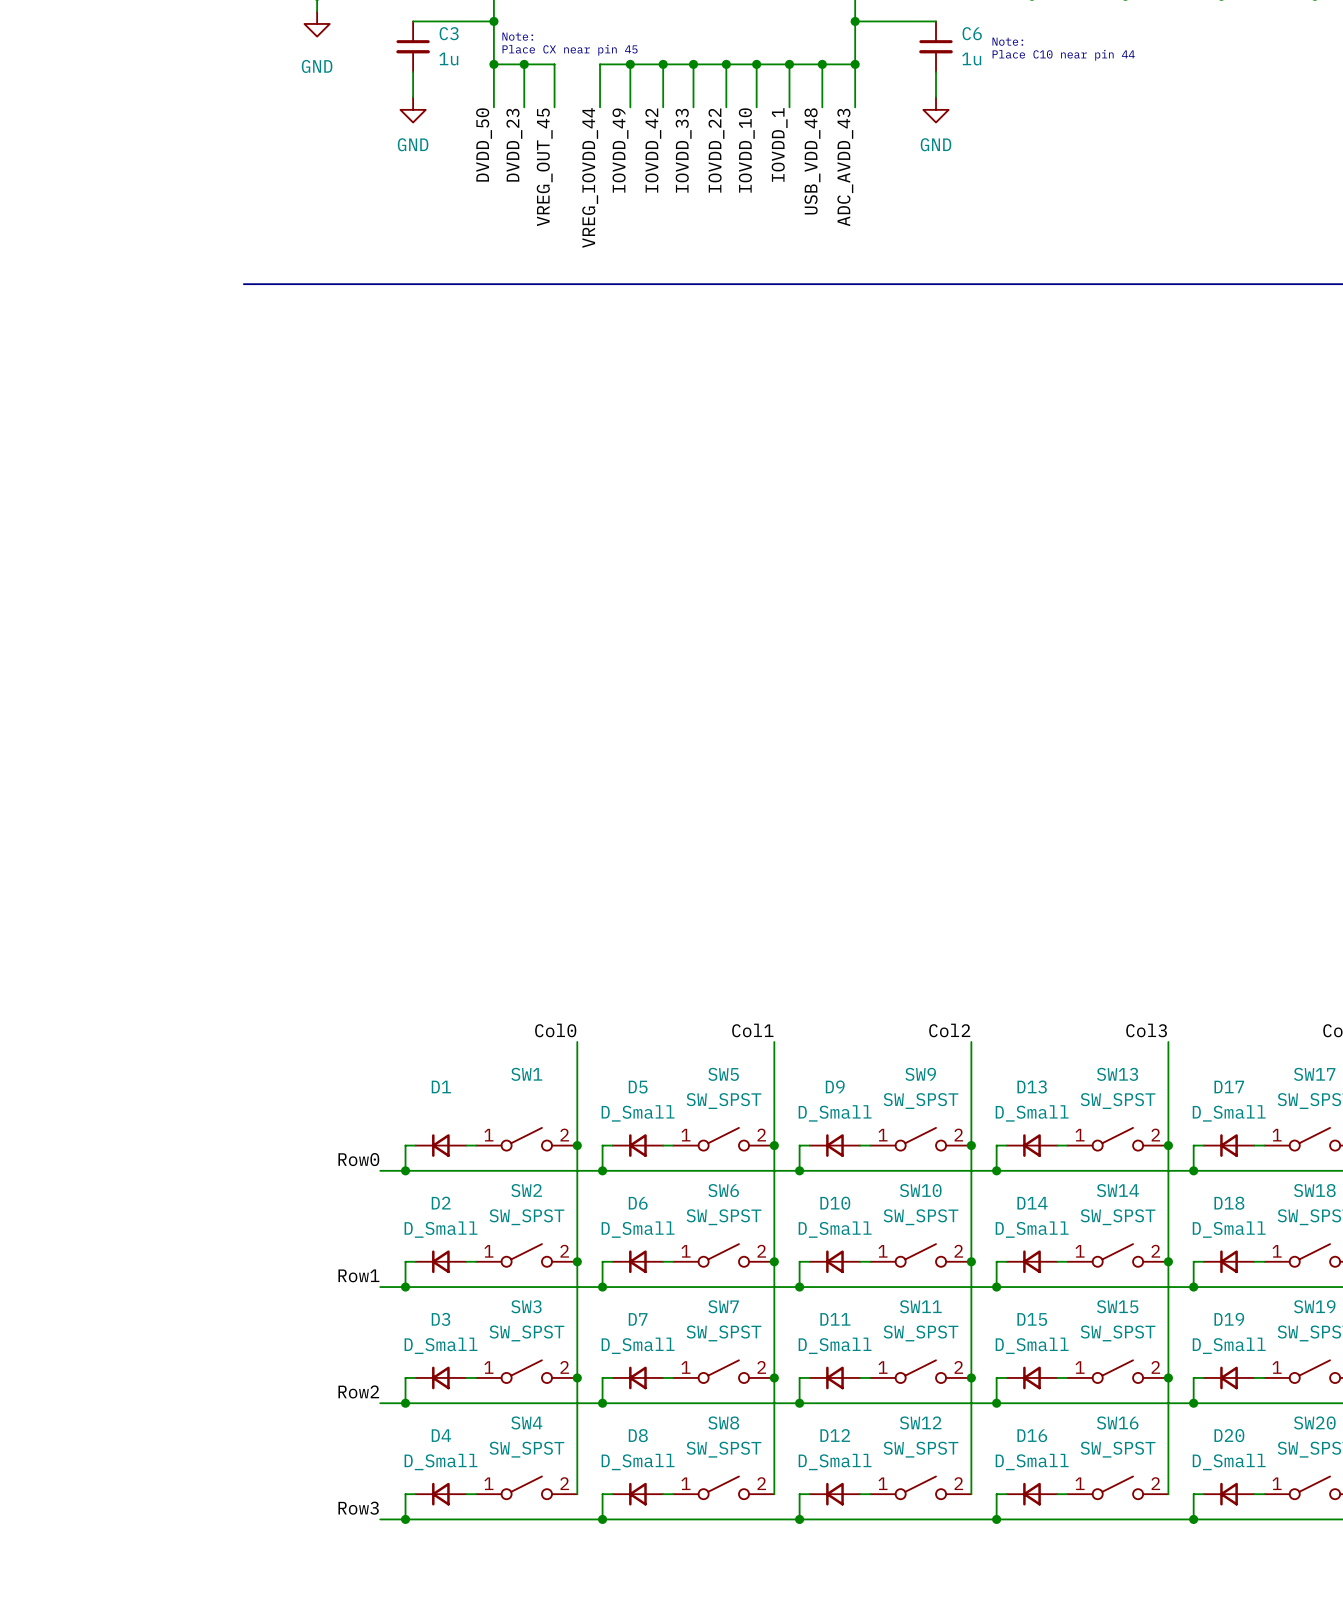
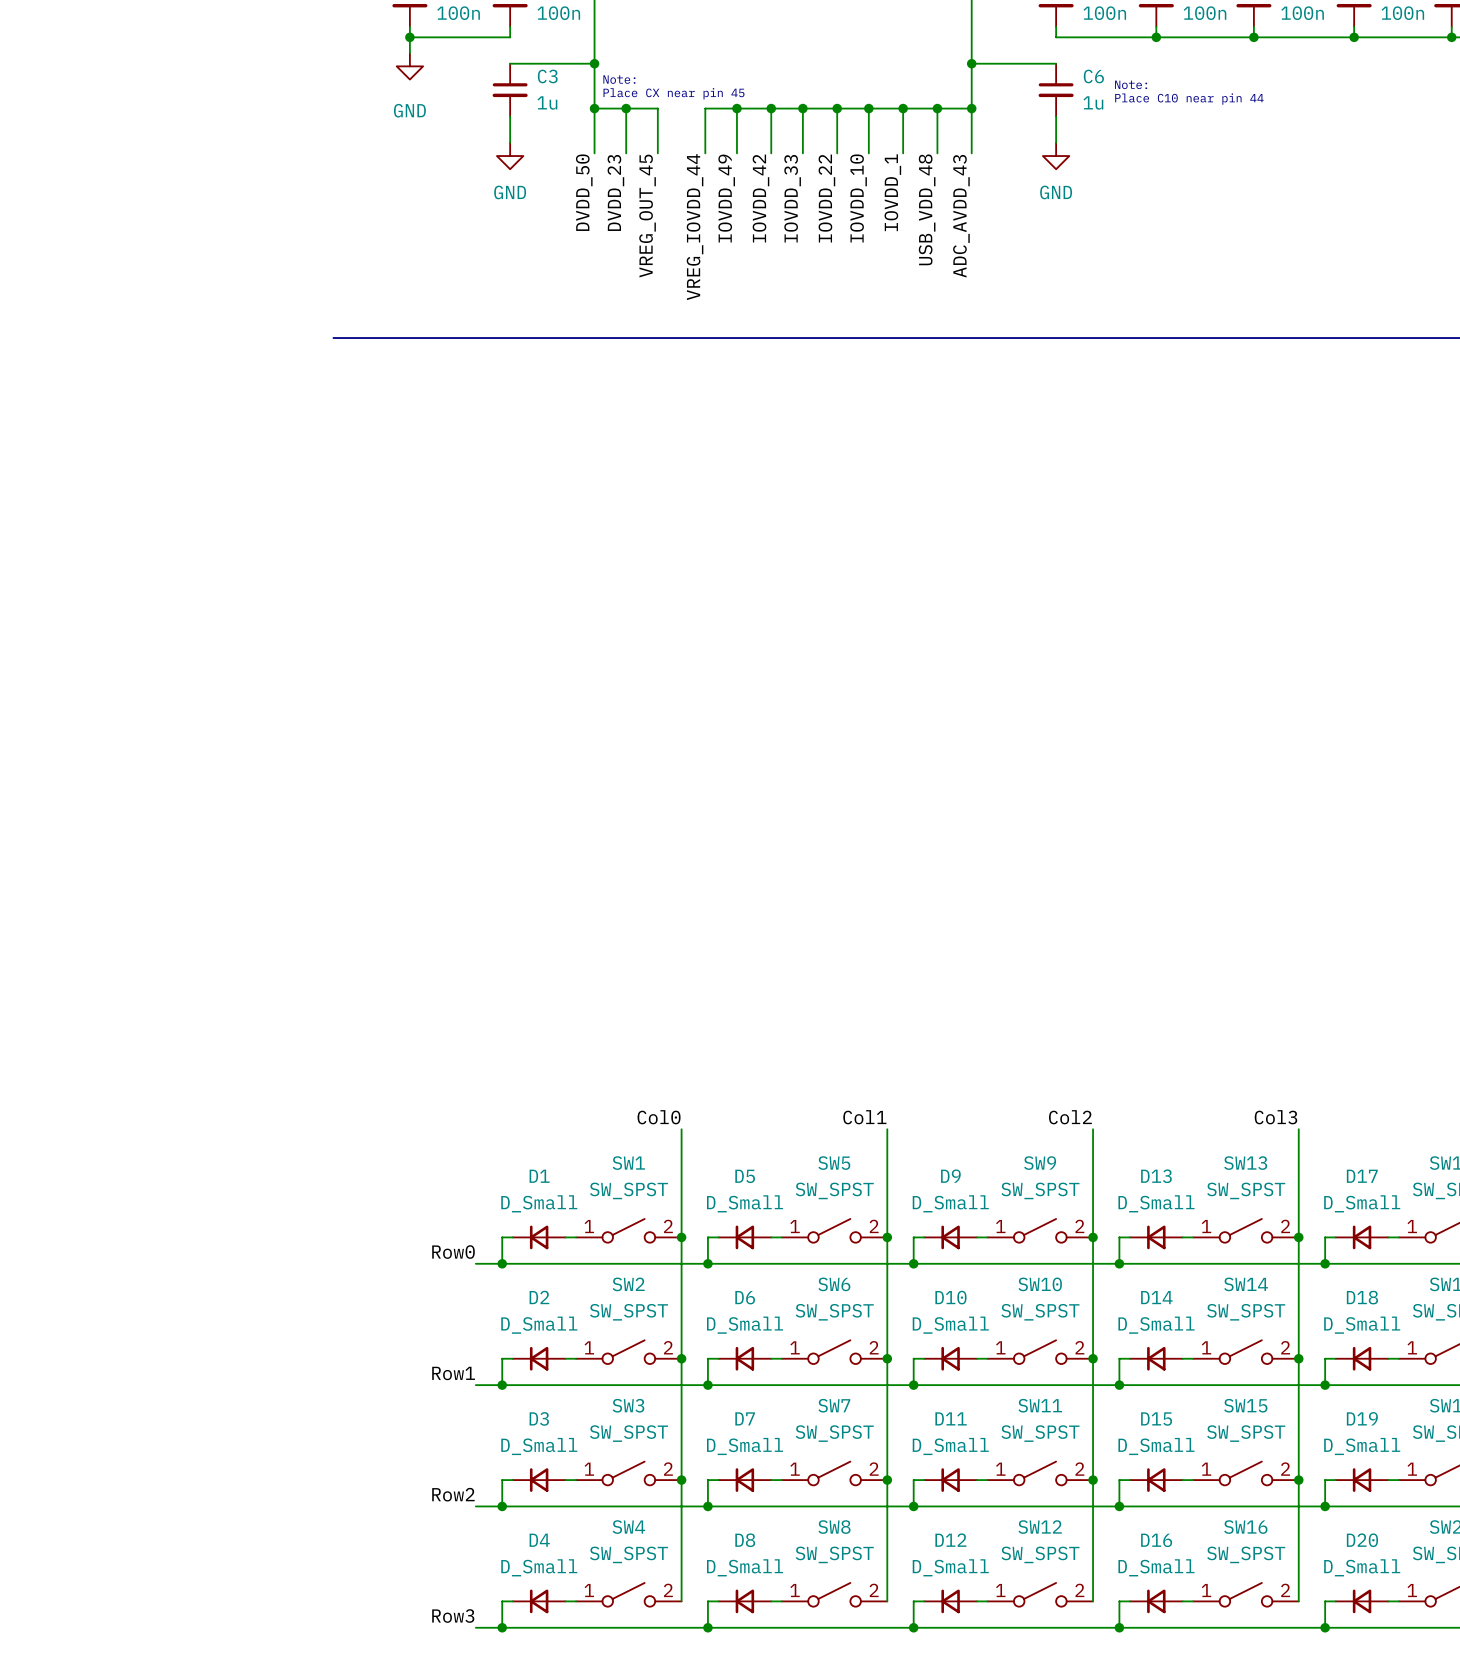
SW1 value: none -> SW_SPST (629, 1190)
D1 value: none -> D_Small (539, 1203)

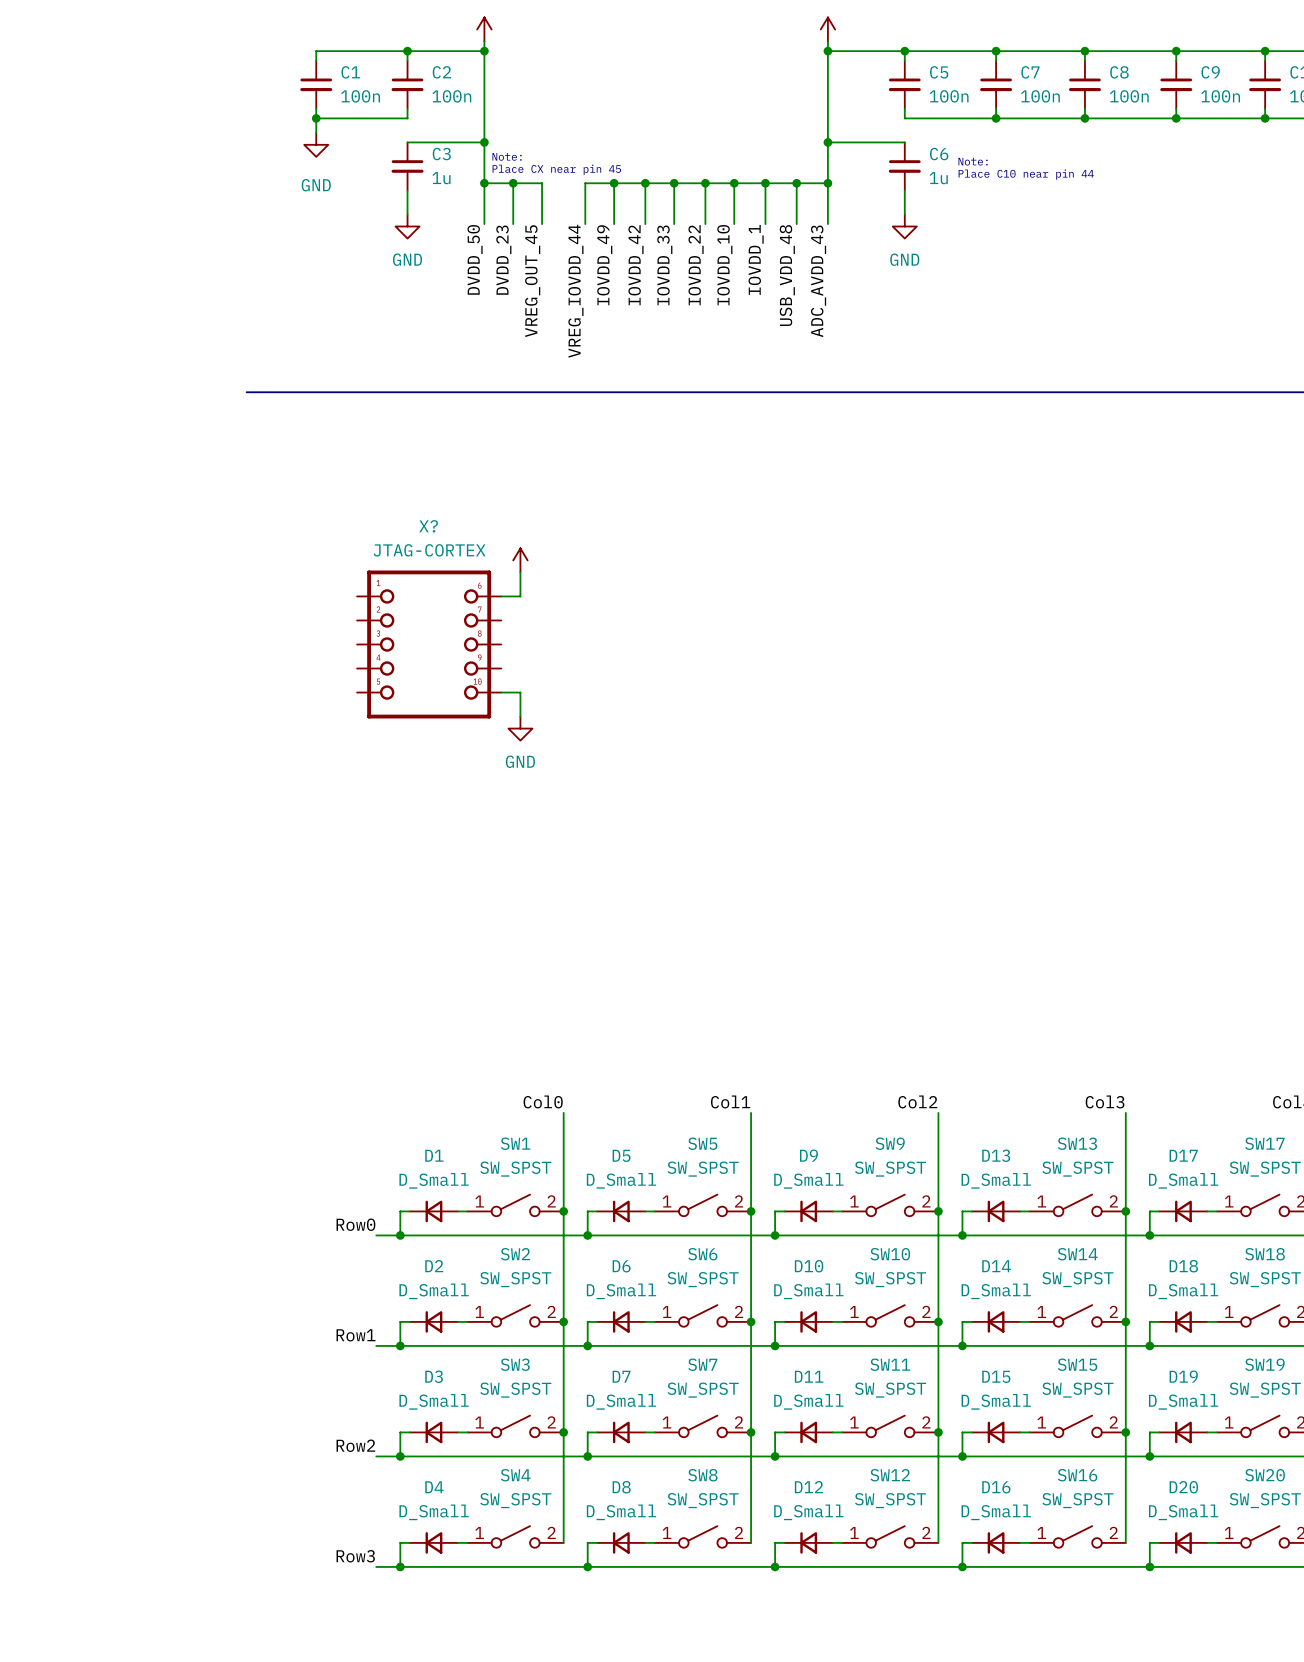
power symbol: none -> (520, 560)
wire: none -> (520, 572) (520, 596) (501, 596)
X?: none -> JTAG-CORTEX (429, 644)
wire: none -> (501, 692) (520, 692) (520, 716)
power symbol: none -> GND (520, 728)

